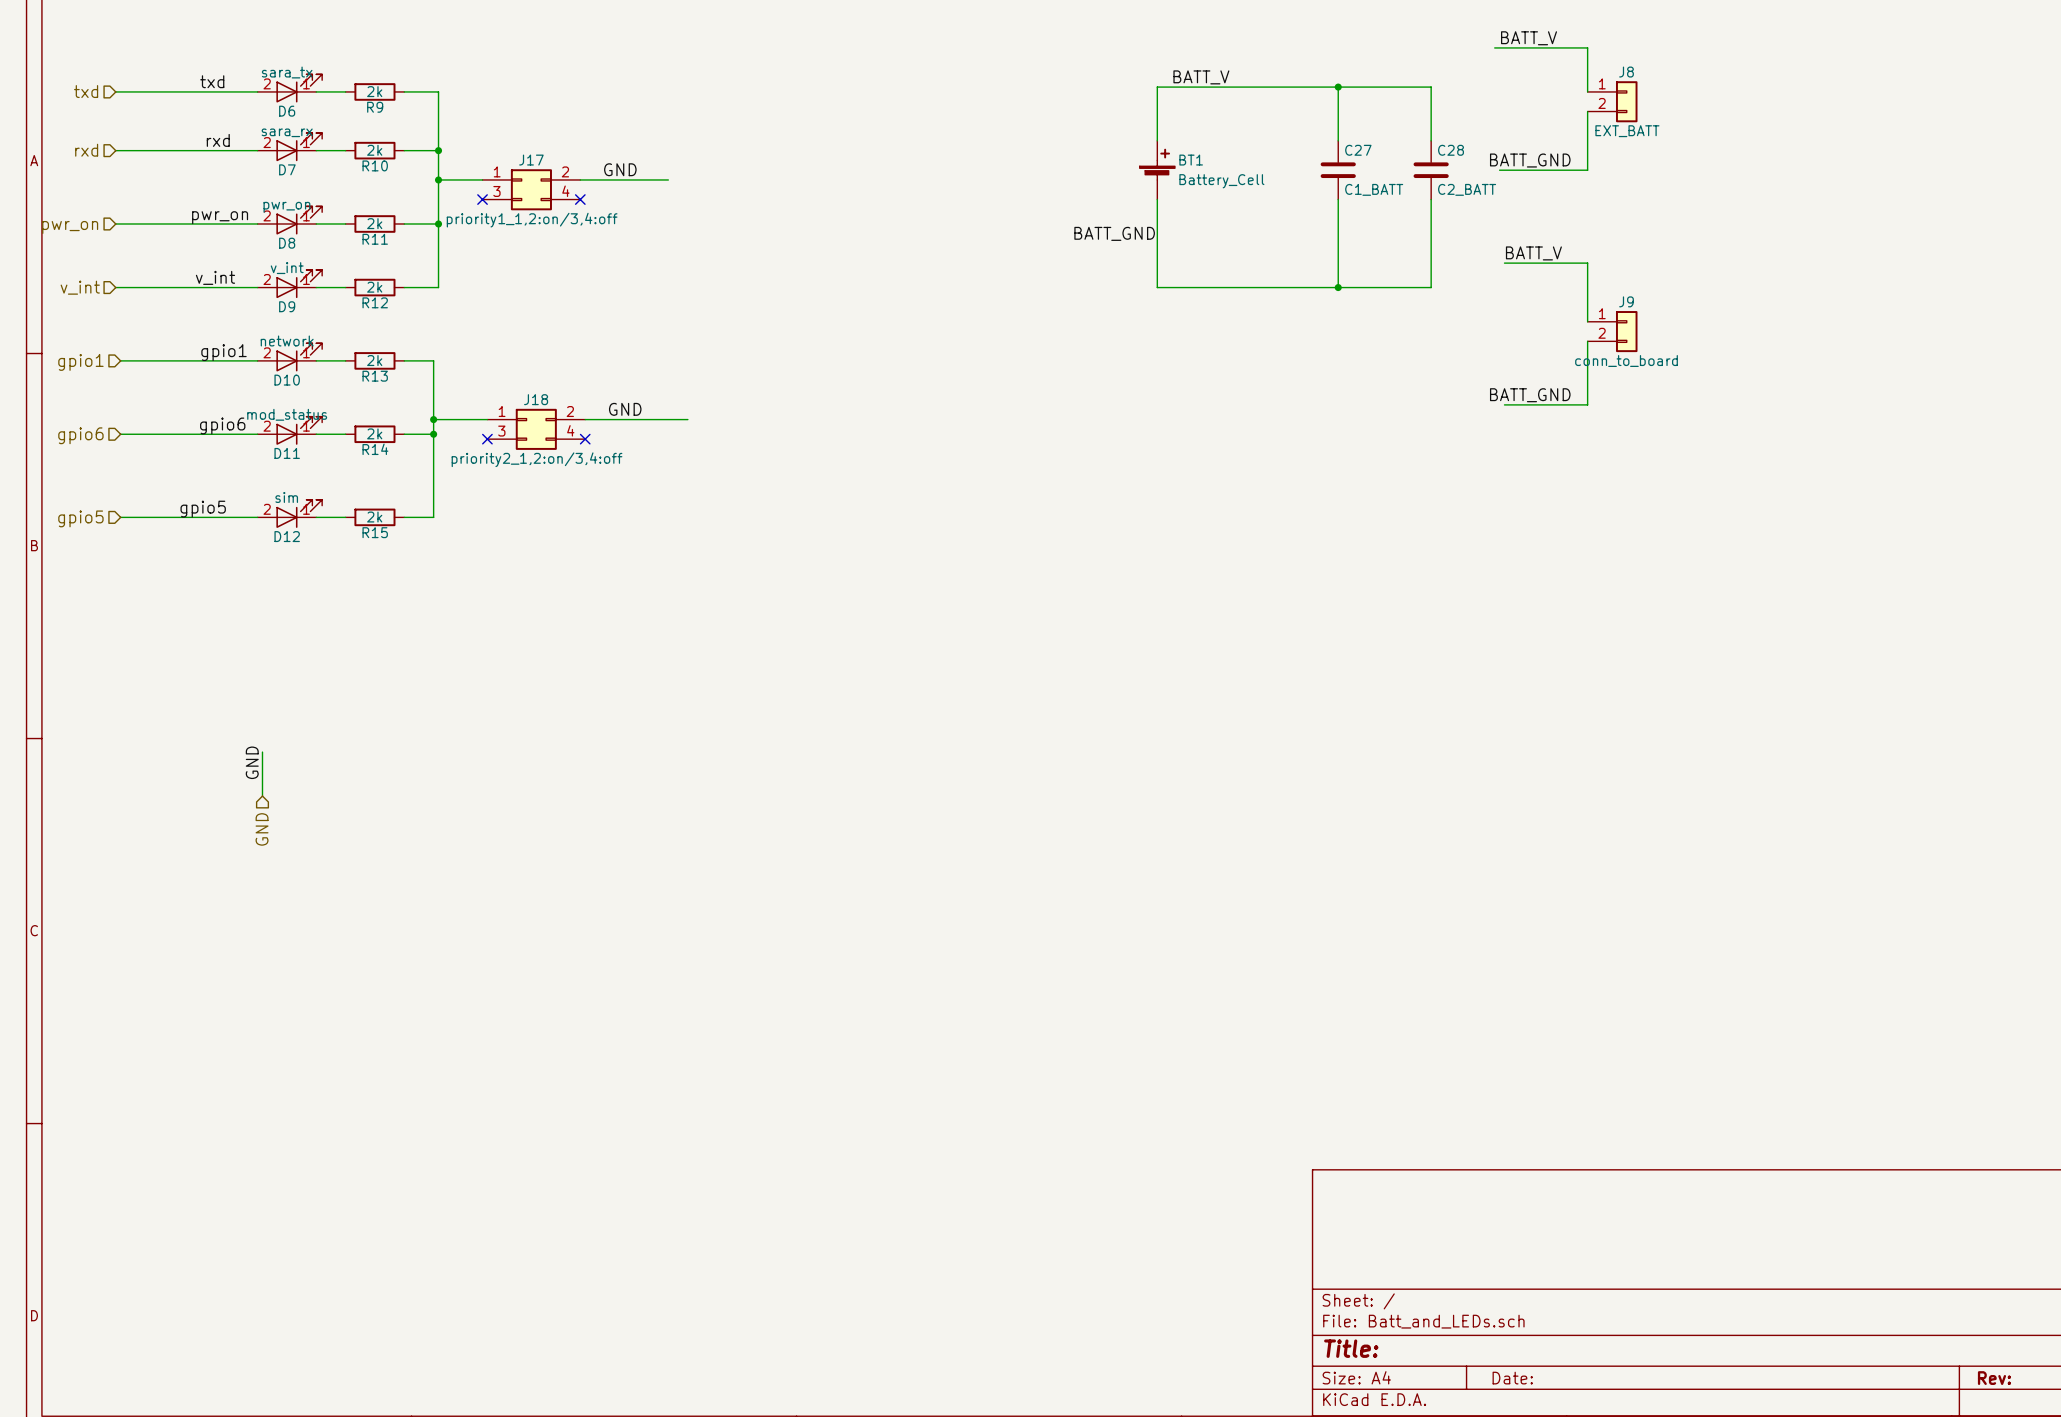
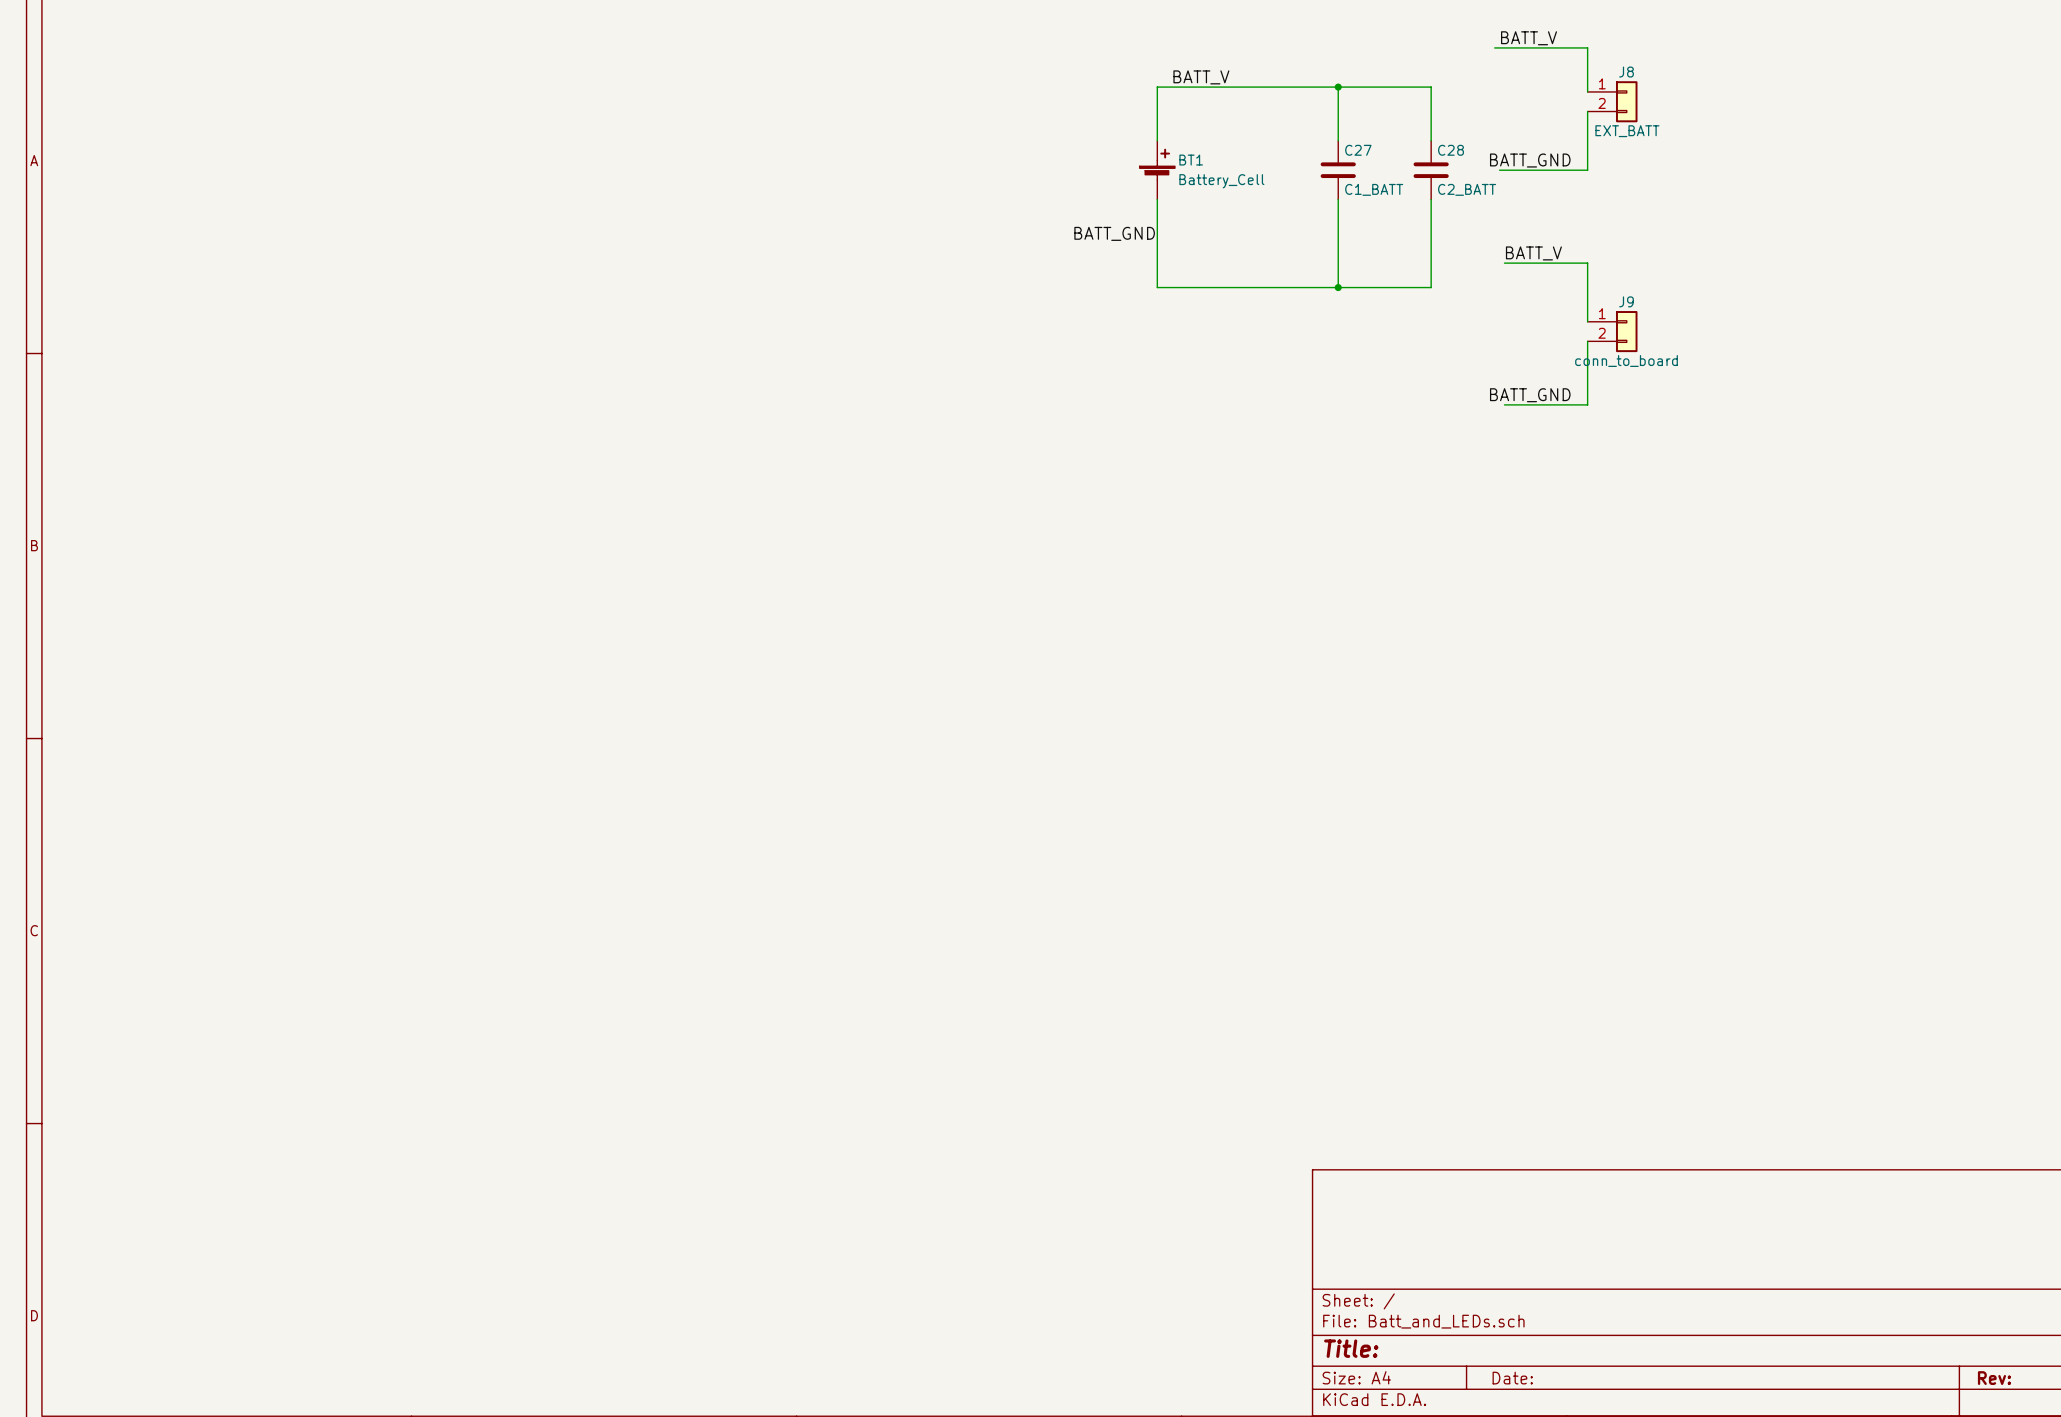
label: txd (212, 81) -> none
D6: sara_tx (289, 88) -> none
hierarchical label: txd (86, 91) -> none
wire: (115, 91) (257, 91) -> none
wire: (316, 91) (345, 91) -> none
R9: 2k (374, 91) -> none
wire: (404, 91) (438, 91) (438, 287) (404, 287) -> none
label: rxd (218, 140) -> none
D7: sara_rx (289, 147) -> none
hierarchical label: rxd (86, 150) -> none
wire: (115, 150) (257, 150) -> none
wire: (316, 150) (345, 150) -> none
R10: 2k (374, 150) -> none
wire: (404, 150) (438, 150) -> none
junction: (438, 150) -> none
label: GND (620, 169) -> none
wire: (438, 179) (482, 179) -> none
junction: (438, 179) -> none
wire: (580, 179) (668, 179) -> none
J17: priority1_1,2:on/3,4:off (531, 189) -> none
no-connect mark: (482, 199) -> none
no-connect mark: (580, 199) -> none
label: pwr_on (220, 217) -> none
D8: pwr_on (289, 220) -> none
wire: (115, 223) (257, 223) -> none
wire: (316, 223) (345, 223) -> none
R11: 2k (374, 223) -> none
wire: (404, 223) (438, 223) -> none
junction: (438, 223) -> none
hierarchical label: pwr_on (70, 227) -> none
label: v_int (215, 277) -> none
D9: v_int (289, 284) -> none
hierarchical label: v_int (80, 287) -> none
wire: (115, 287) (257, 287) -> none
wire: (316, 287) (345, 287) -> none
R12: 2k (374, 287) -> none
label: gpio1 (224, 352) -> none
D10: network (289, 357) -> none
wire: (120, 360) (257, 360) -> none
wire: (316, 360) (345, 360) -> none
R13: 2k (374, 360) -> none
wire: (404, 360) (433, 360) (433, 517) (404, 517) -> none
hierarchical label: gpio1 (80, 362) -> none
label: GND (625, 409) -> none
wire: (433, 419) (487, 419) -> none
junction: (433, 419) -> none
wire: (585, 419) (687, 419) -> none
label: gpio6 (222, 425) -> none
J18: priority2_1,2:on/3,4:off (536, 429) -> none
D11: mod_status (289, 430) -> none
wire: (120, 434) (257, 434) -> none
wire: (316, 434) (345, 434) -> none
R14: 2k (374, 434) -> none
wire: (404, 434) (433, 434) -> none
junction: (433, 434) -> none
hierarchical label: gpio6 (80, 435) -> none
no-connect mark: (487, 439) -> none
no-connect mark: (585, 439) -> none
label: gpio5 (203, 509) -> none
D12: sim (289, 513) -> none
wire: (120, 517) (257, 517) -> none
wire: (316, 517) (345, 517) -> none
R15: 2k (374, 517) -> none
hierarchical label: gpio5 (80, 518) -> none
wire: (262, 752) (262, 796) -> none
label: GND (252, 762) -> none
hierarchical label: GND (262, 829) -> none

